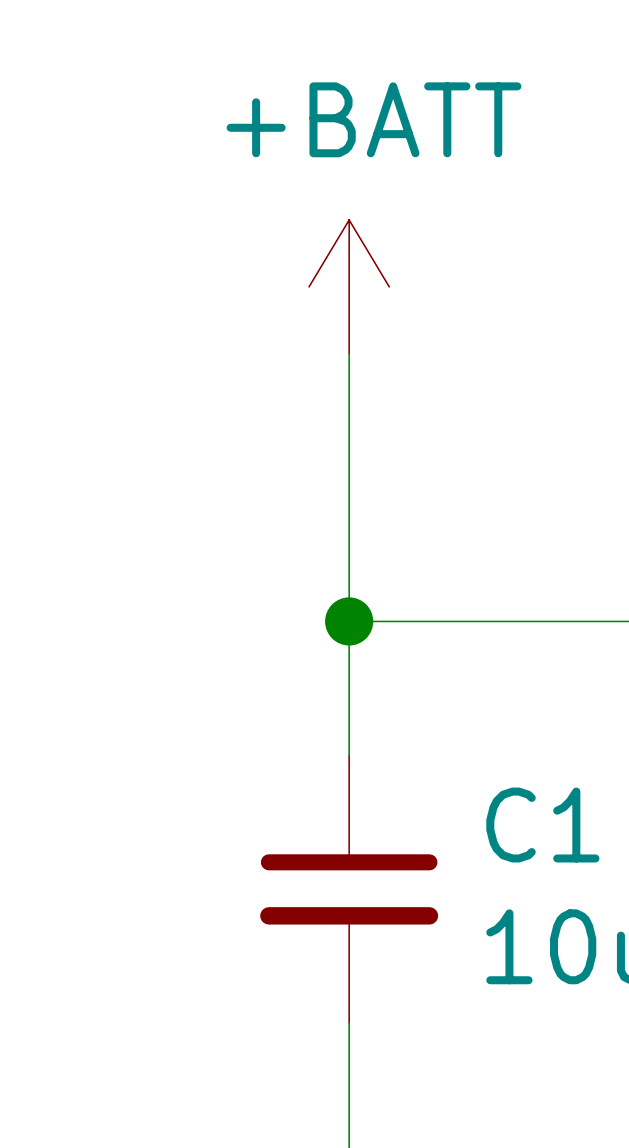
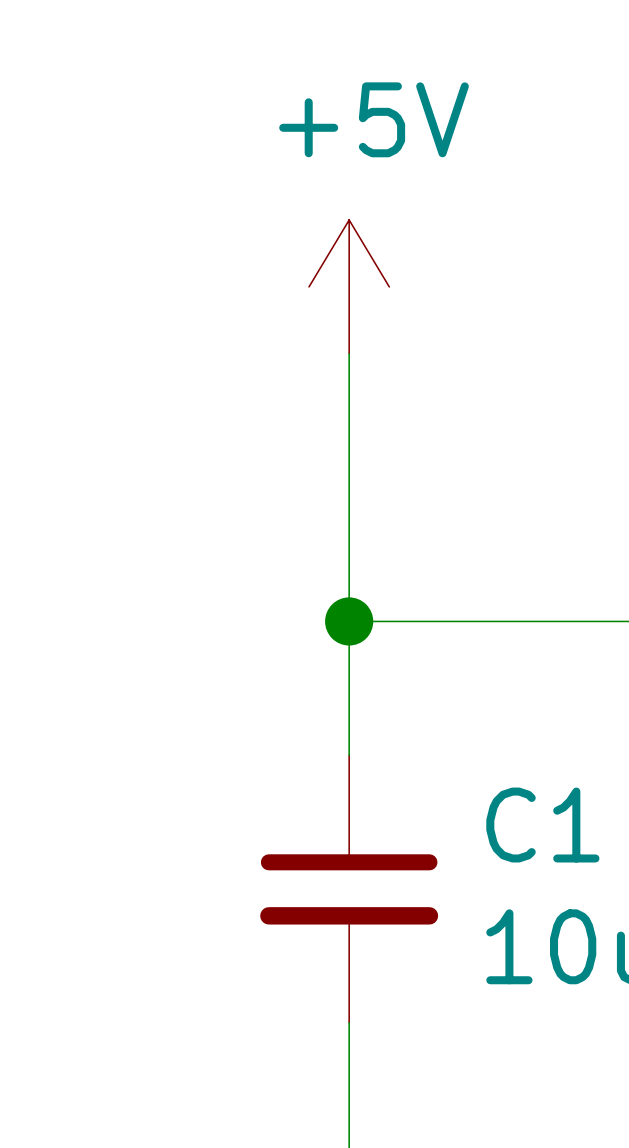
power symbol: +BATT (349, 286) -> +5V (349, 286)

